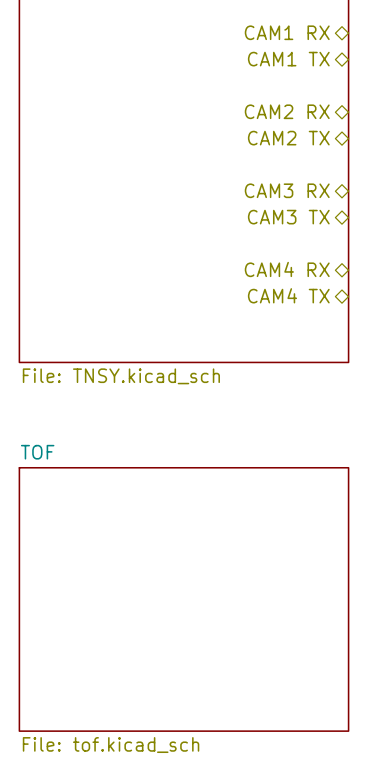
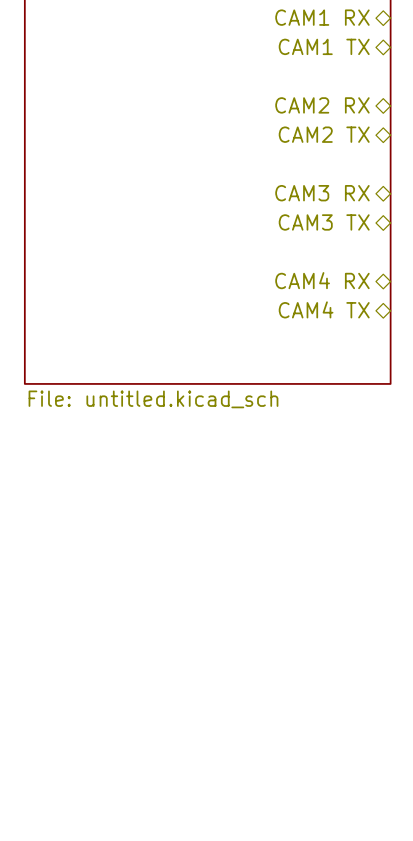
sheet value: File: TNSY.kicad_sch (121, 376) -> File: untitled.kicad_sch (153, 399)
sheet TOF: File: tof.kicad_sch (183, 599) -> none

